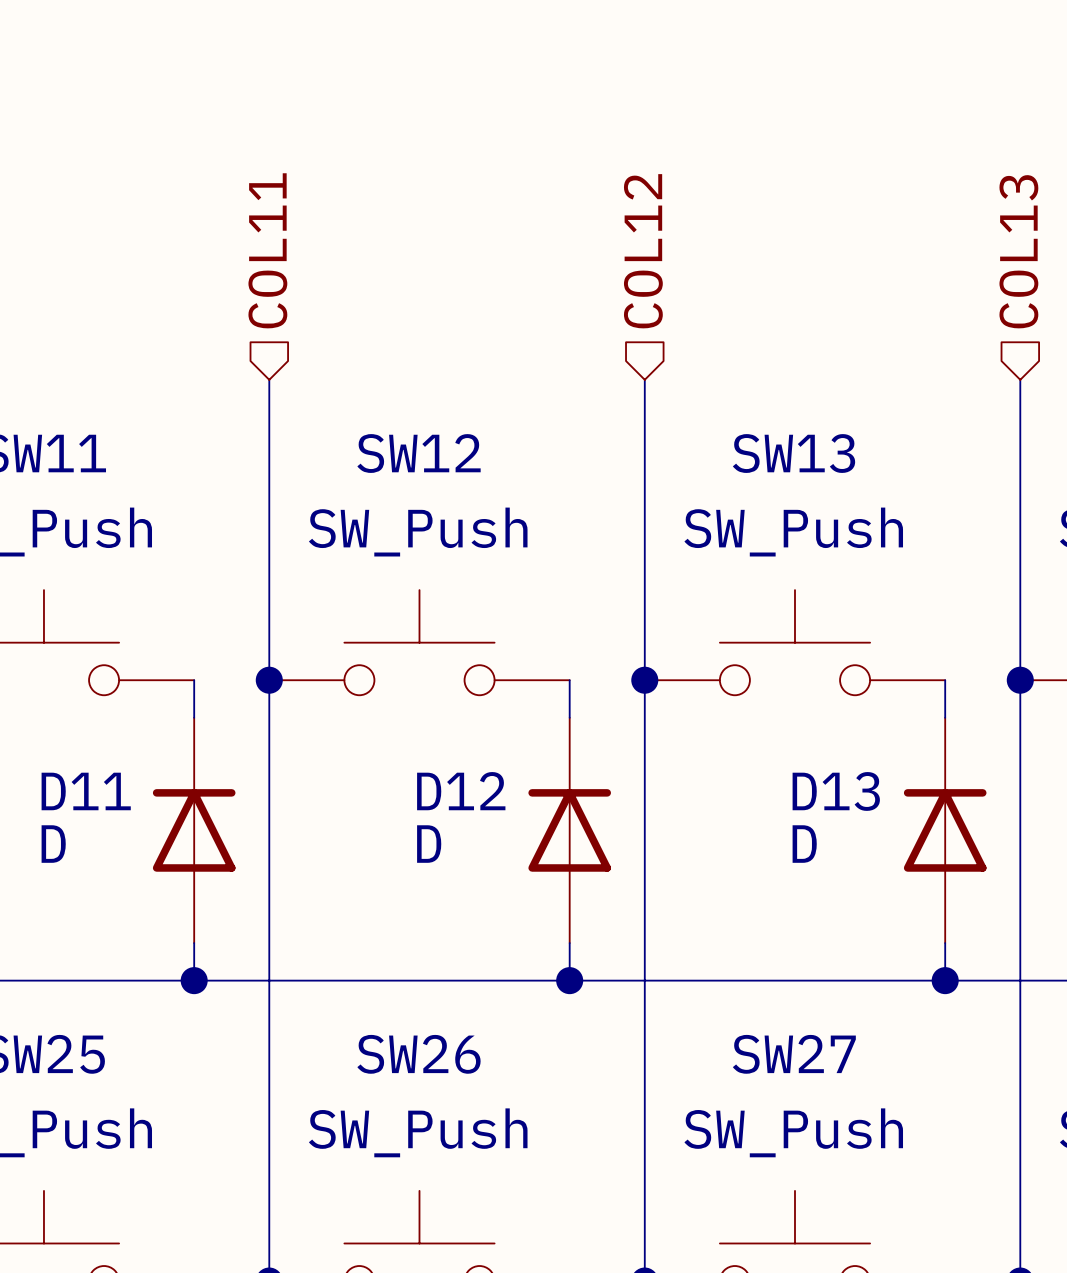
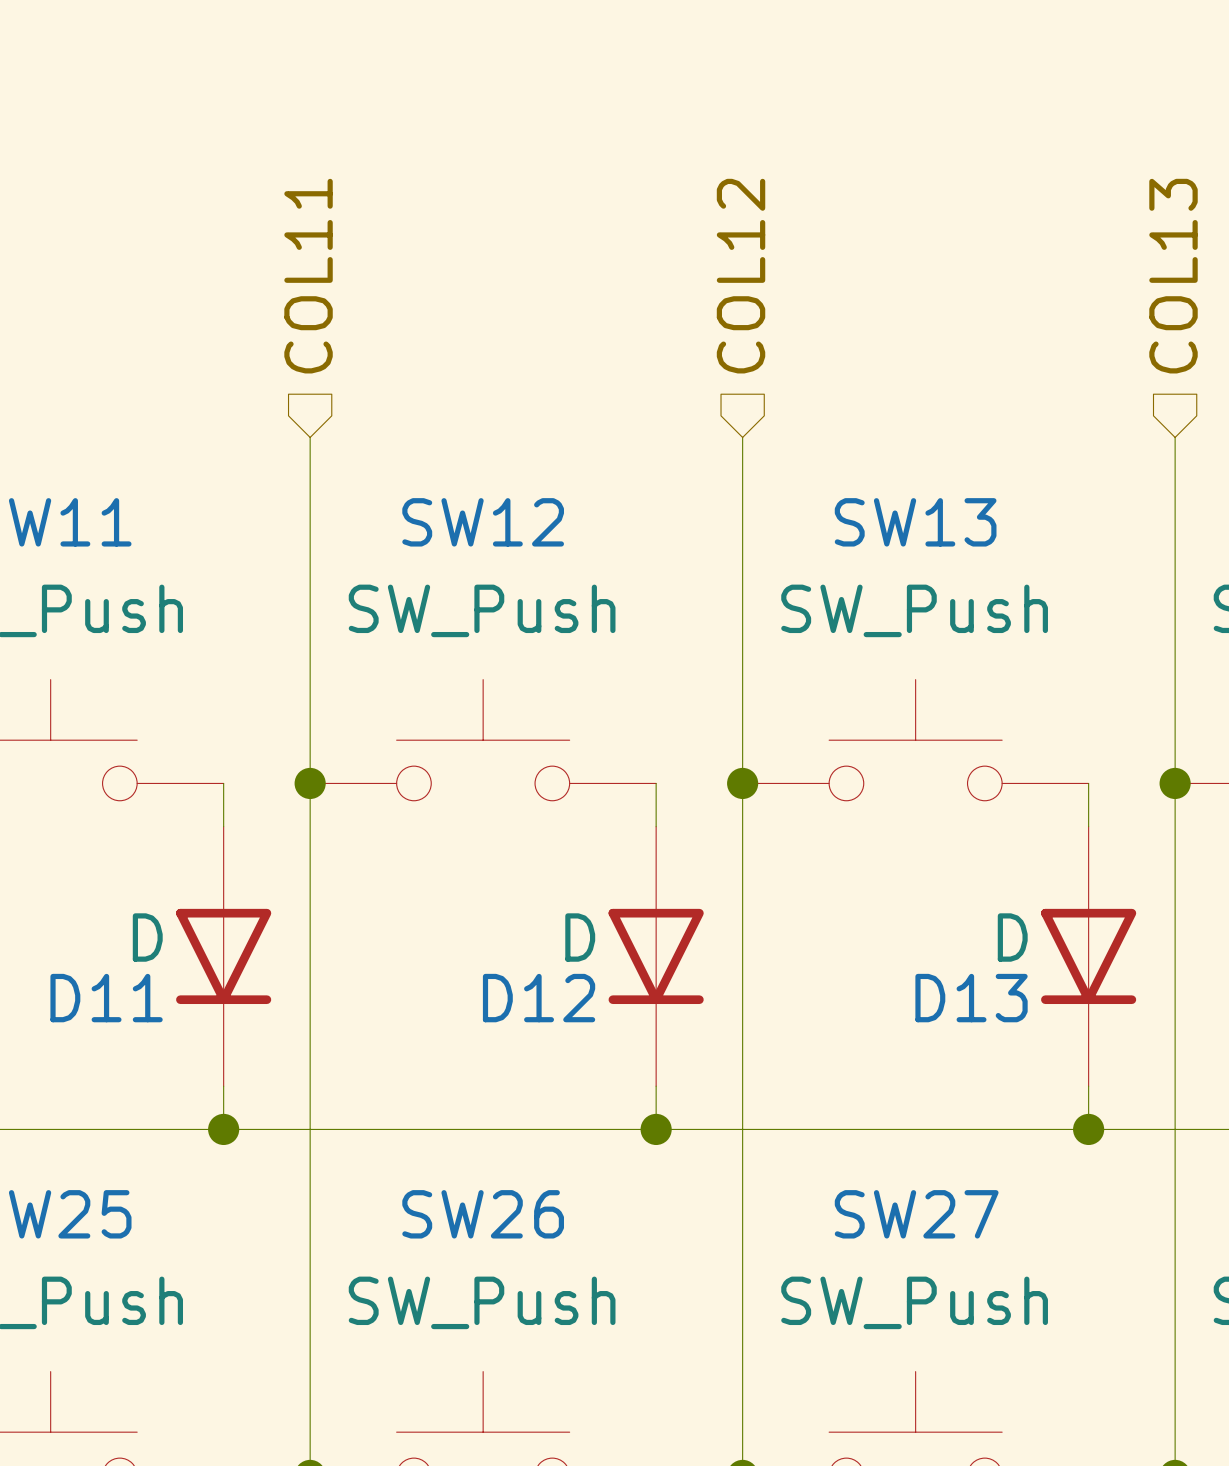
D11 name position: D11 (86, 791) -> D11 (106, 998)
D12 name position: D12 (461, 791) -> D12 (539, 998)
D13 name position: D13 (836, 791) -> D13 (971, 998)
D11 rotation: 0° (194, 830) -> 180° (223, 956)
D12 rotation: 0° (569, 830) -> 180° (656, 956)
D13 rotation: 0° (945, 830) -> 180° (1088, 956)
D11 value position: D (53, 844) -> D (147, 937)
D12 value position: D (429, 844) -> D (580, 937)
D13 value position: D (804, 844) -> D (1012, 937)

